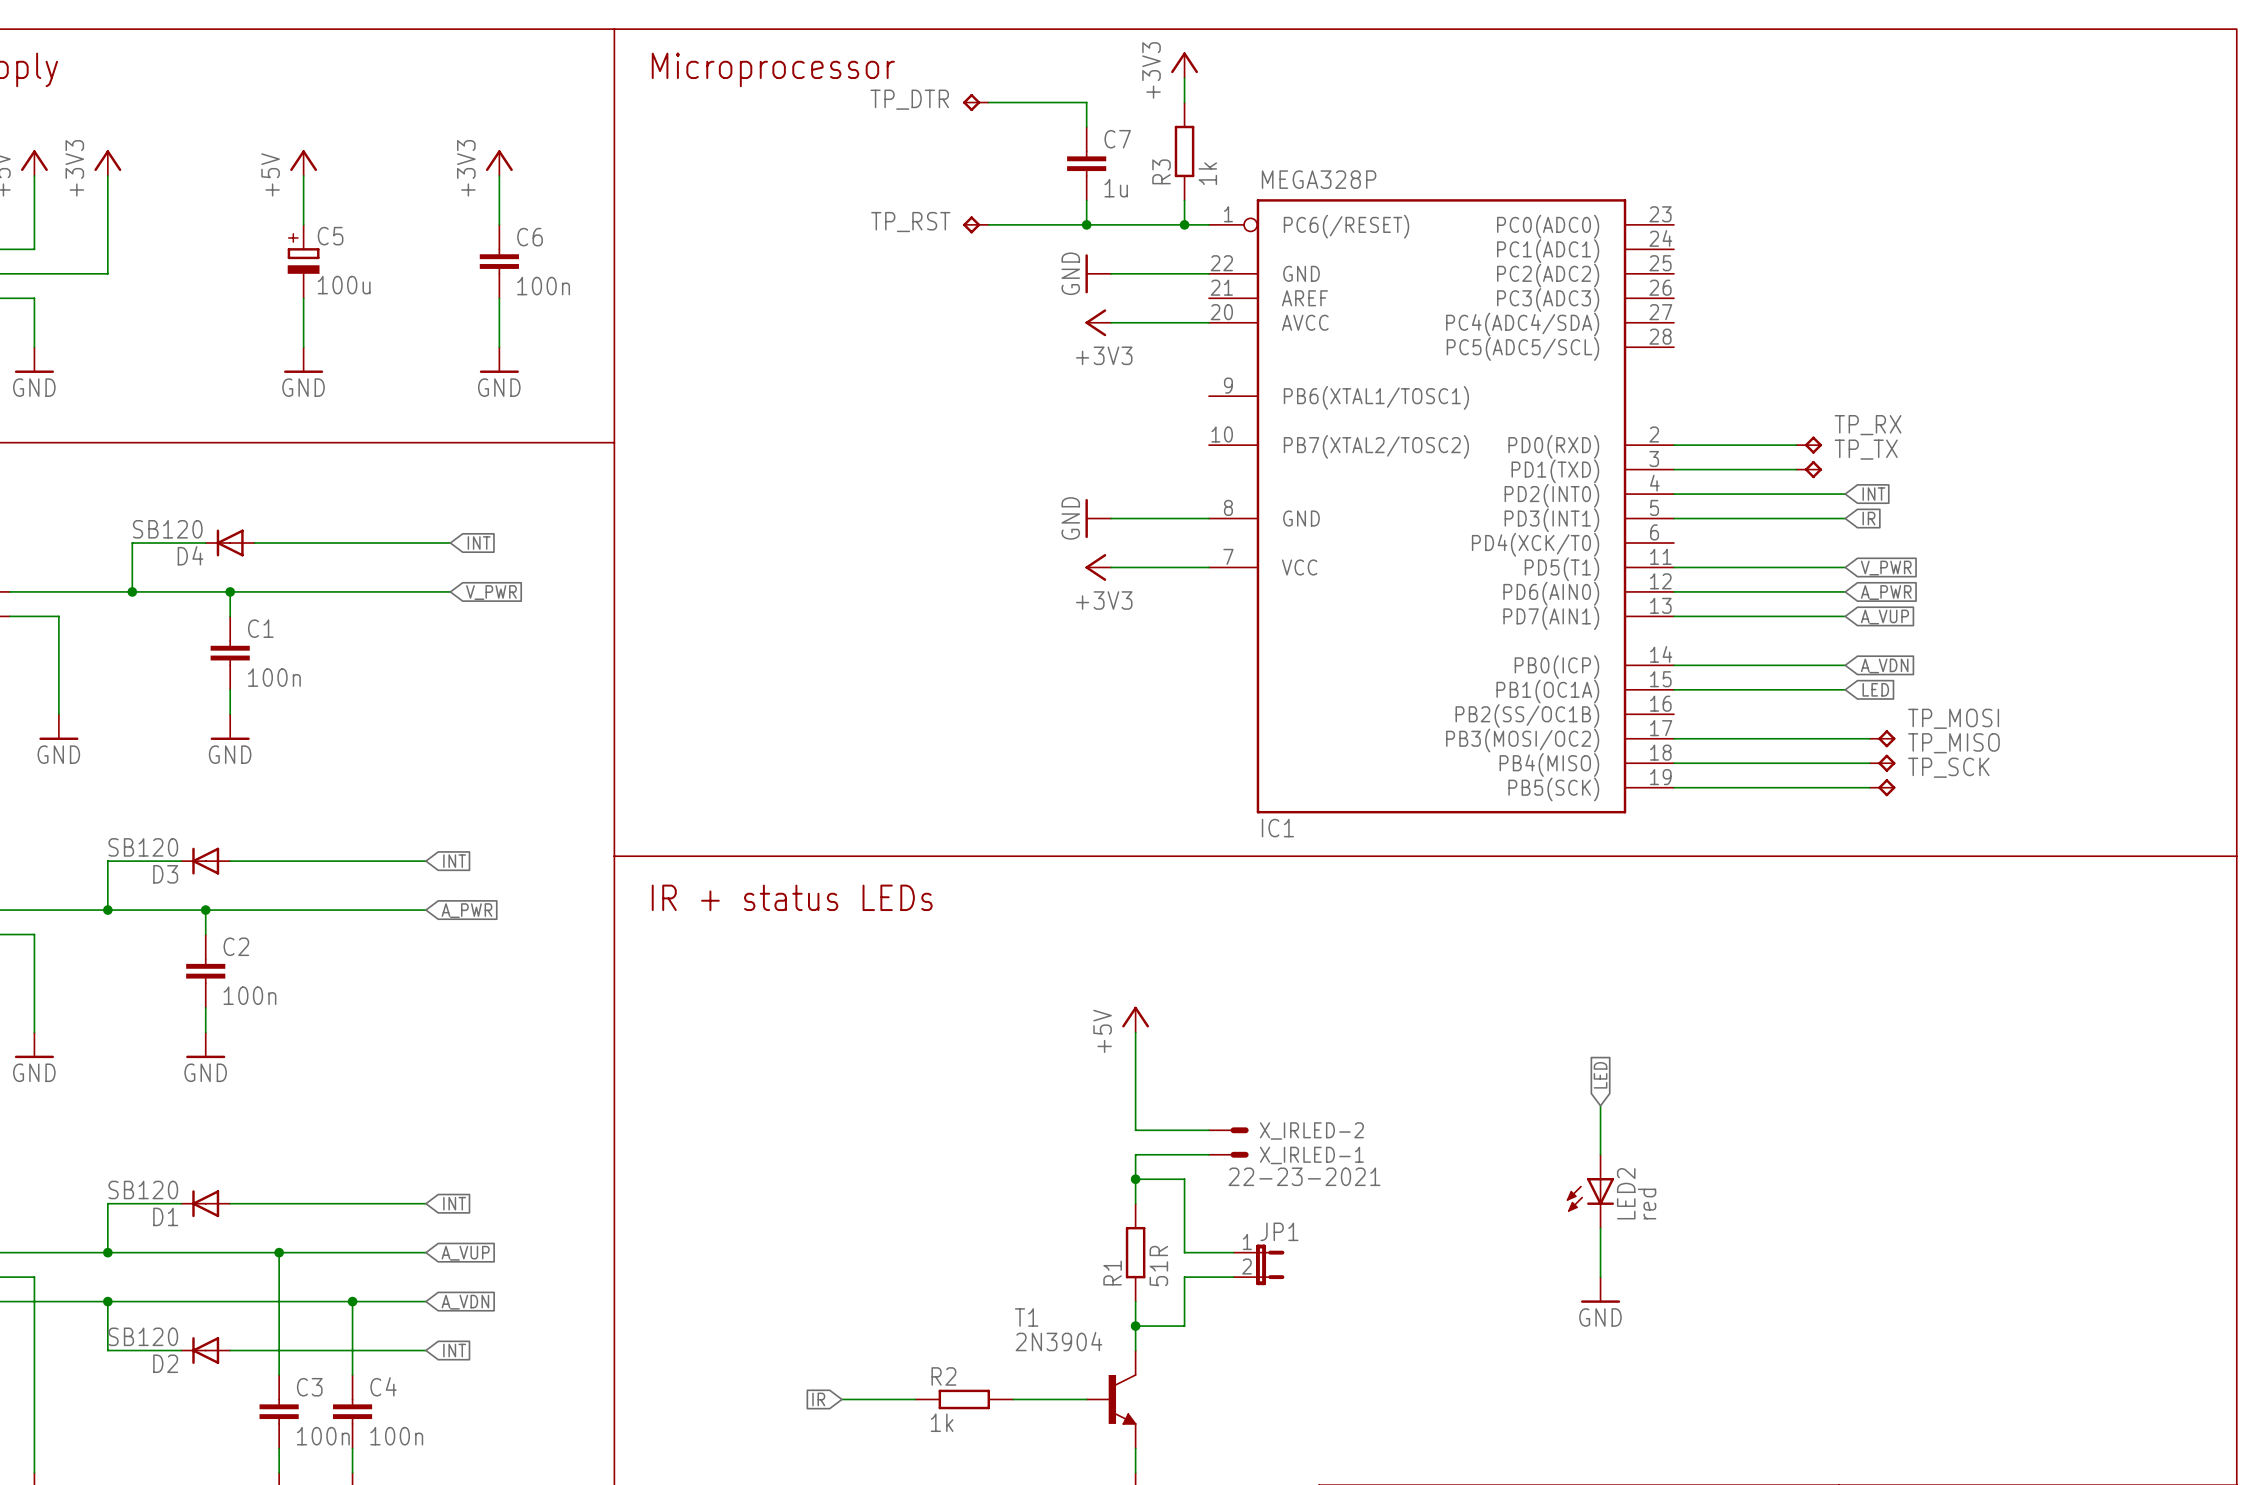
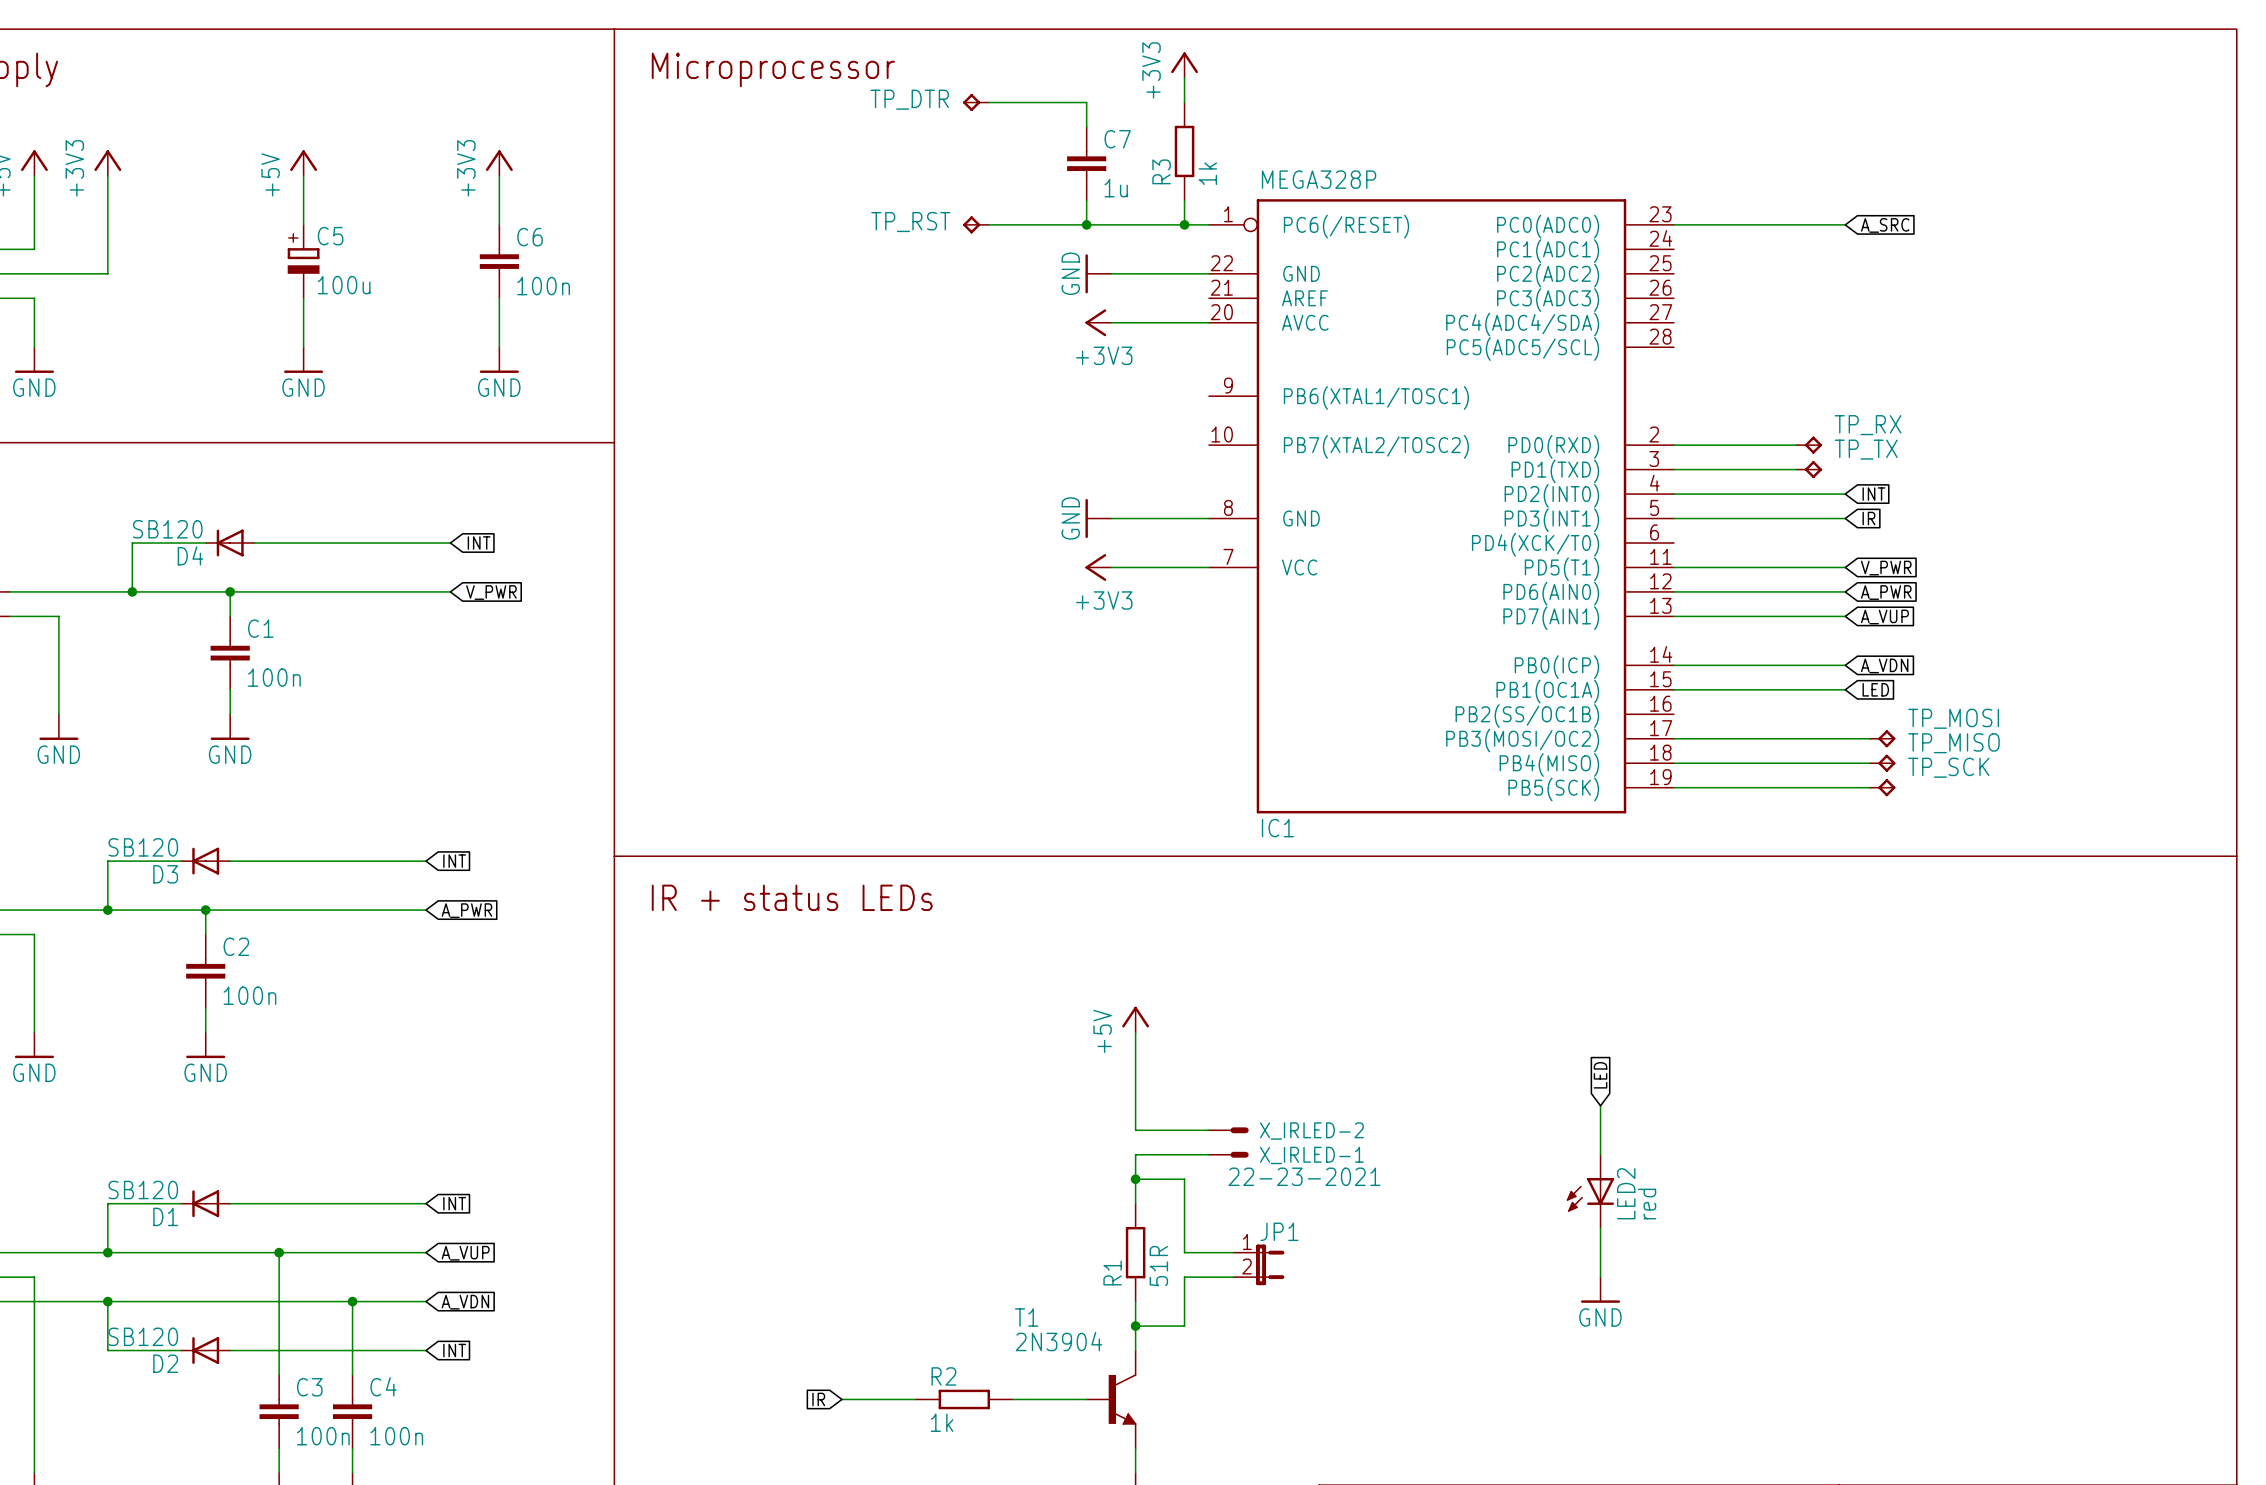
wire: none -> (1673, 224) (1845, 224)
global label: none -> A_SRC (1885, 225)

